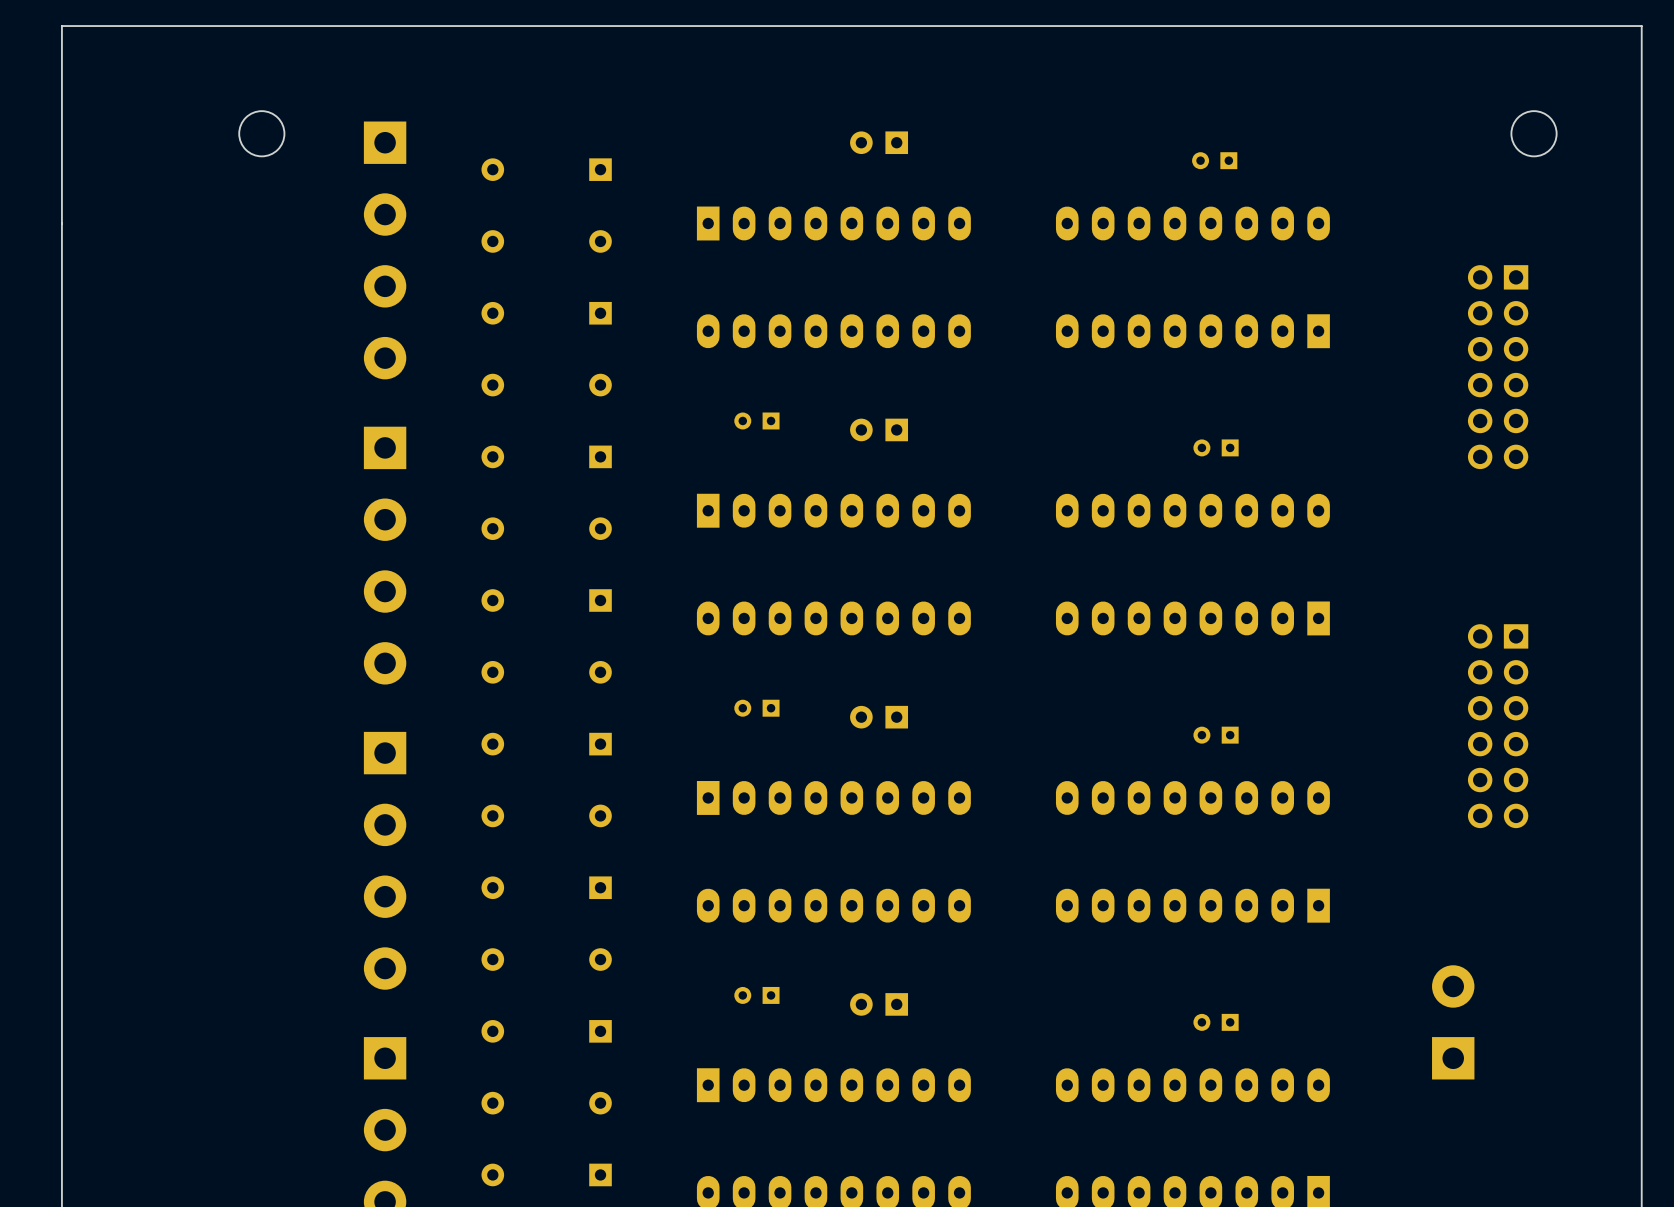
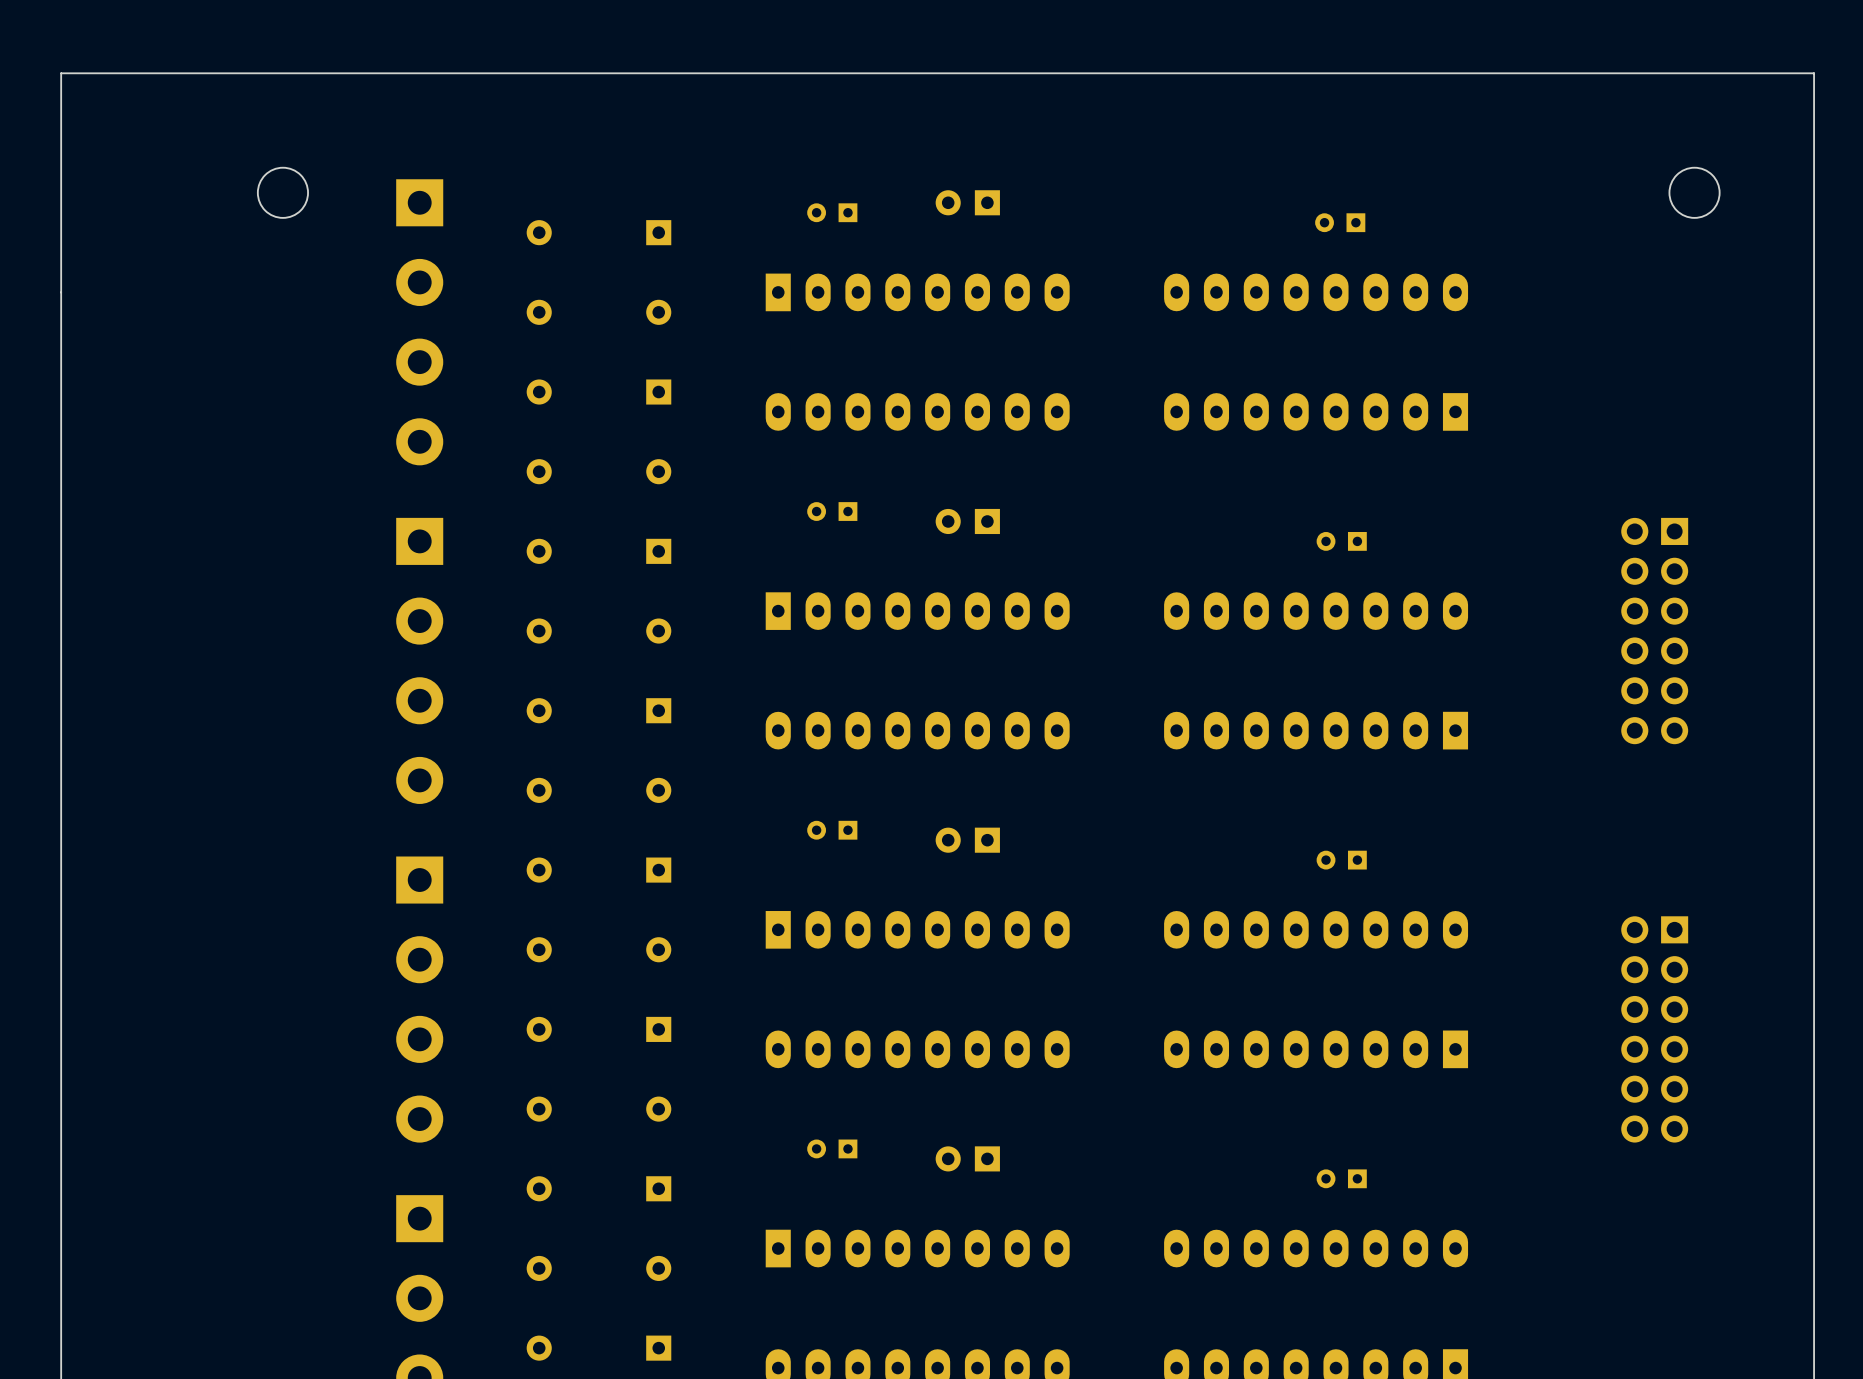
part: none -> (832, 212)
part: (1498, 367) -> none
part: none -> (1654, 631)
part: (1498, 726) -> none
part: none -> (1654, 1029)
part: (1453, 1022) -> none

